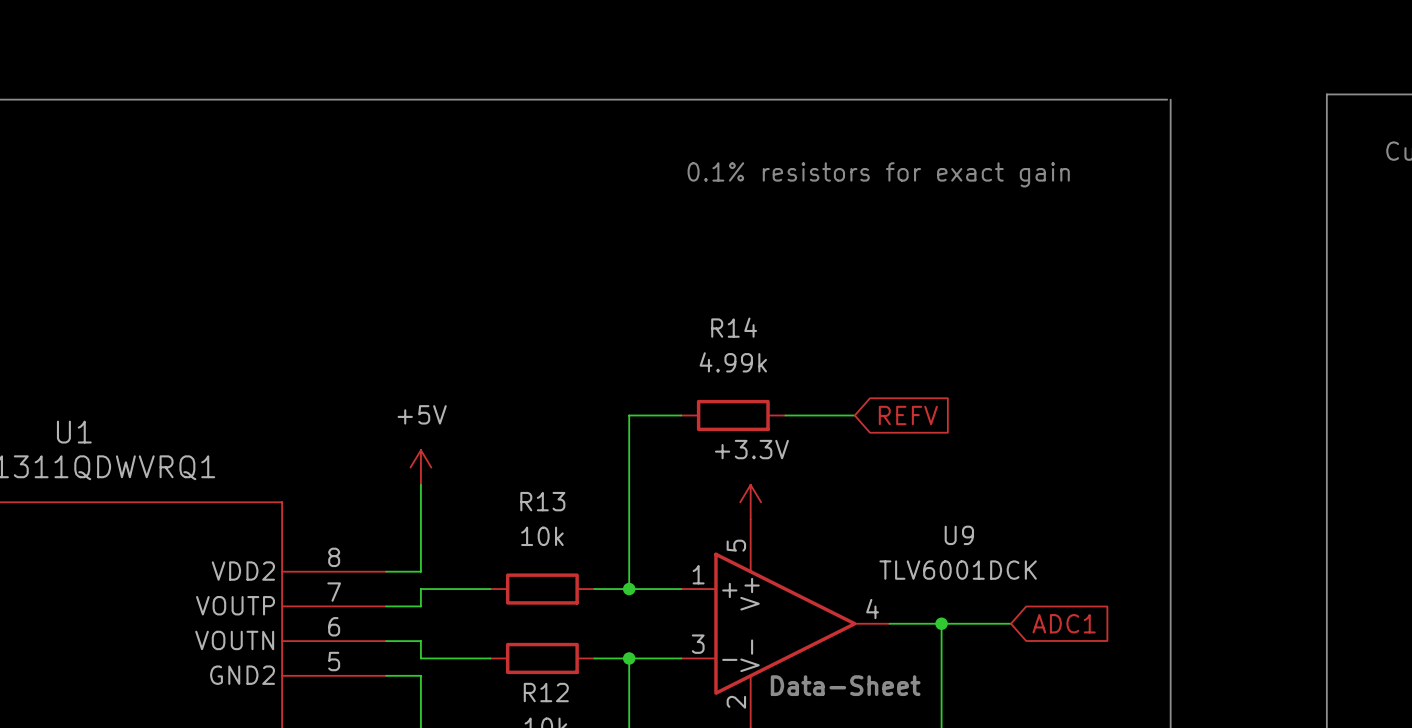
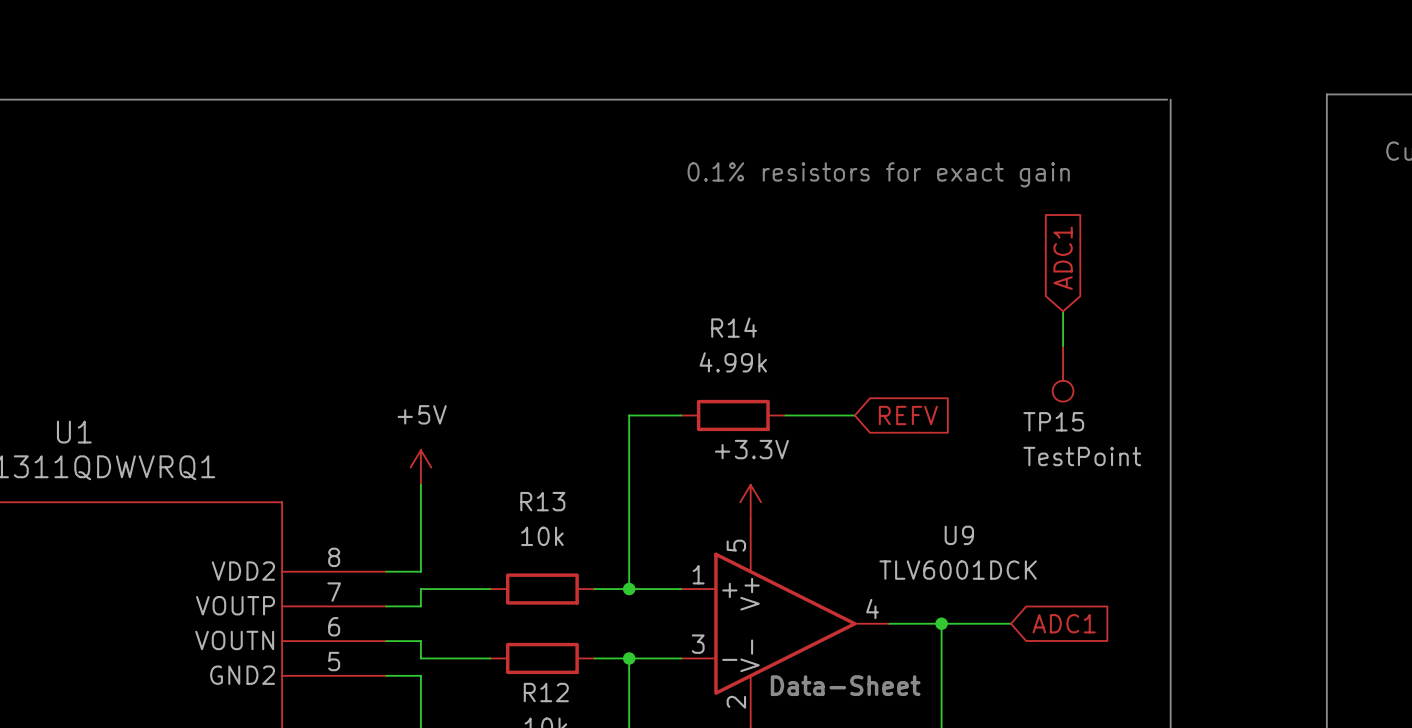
global label: none -> ADC1 (1063, 258)
wire: none -> (1063, 311) (1063, 346)
TP15: none -> TestPoint (1063, 373)

